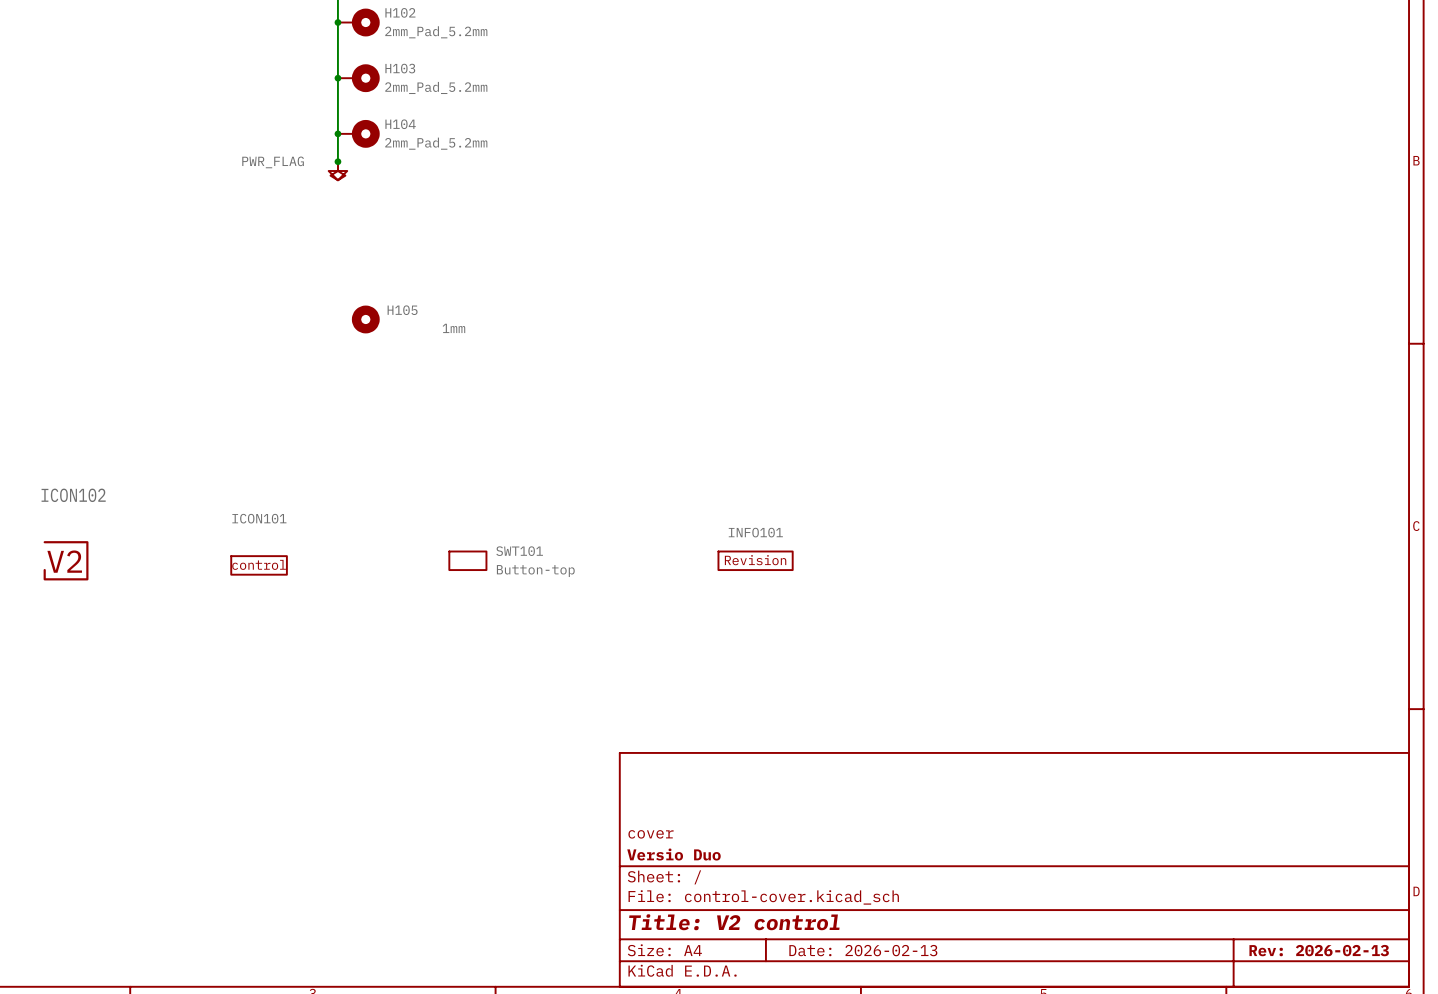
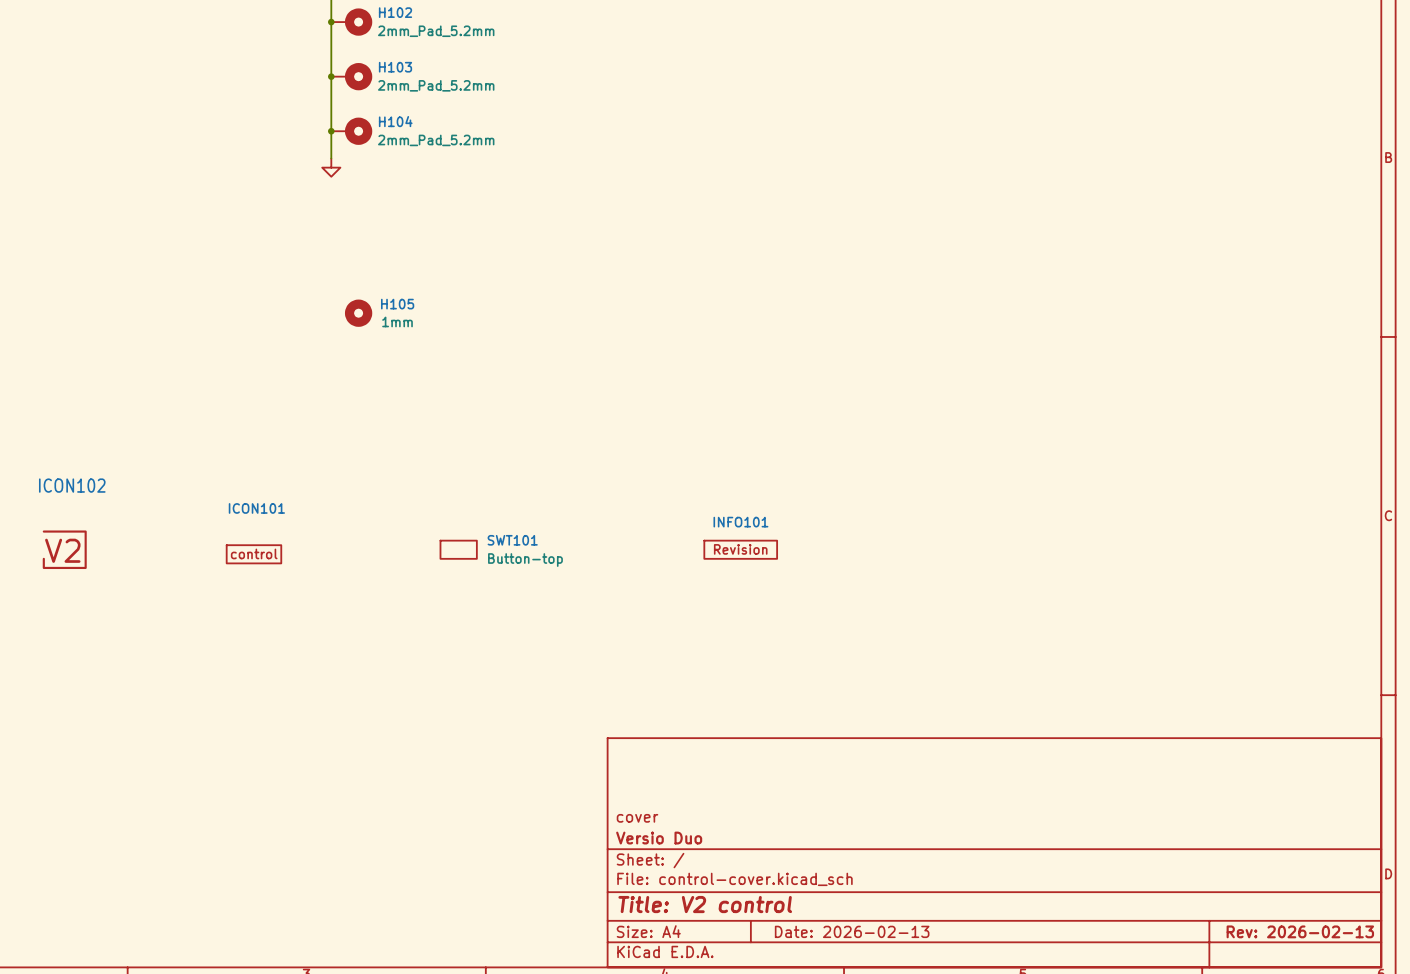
junction: (337, 161) -> none
power symbol: PWR_FLAG (337, 171) -> none
H105 value position: 1mm (453, 328) -> 1mm (397, 321)

